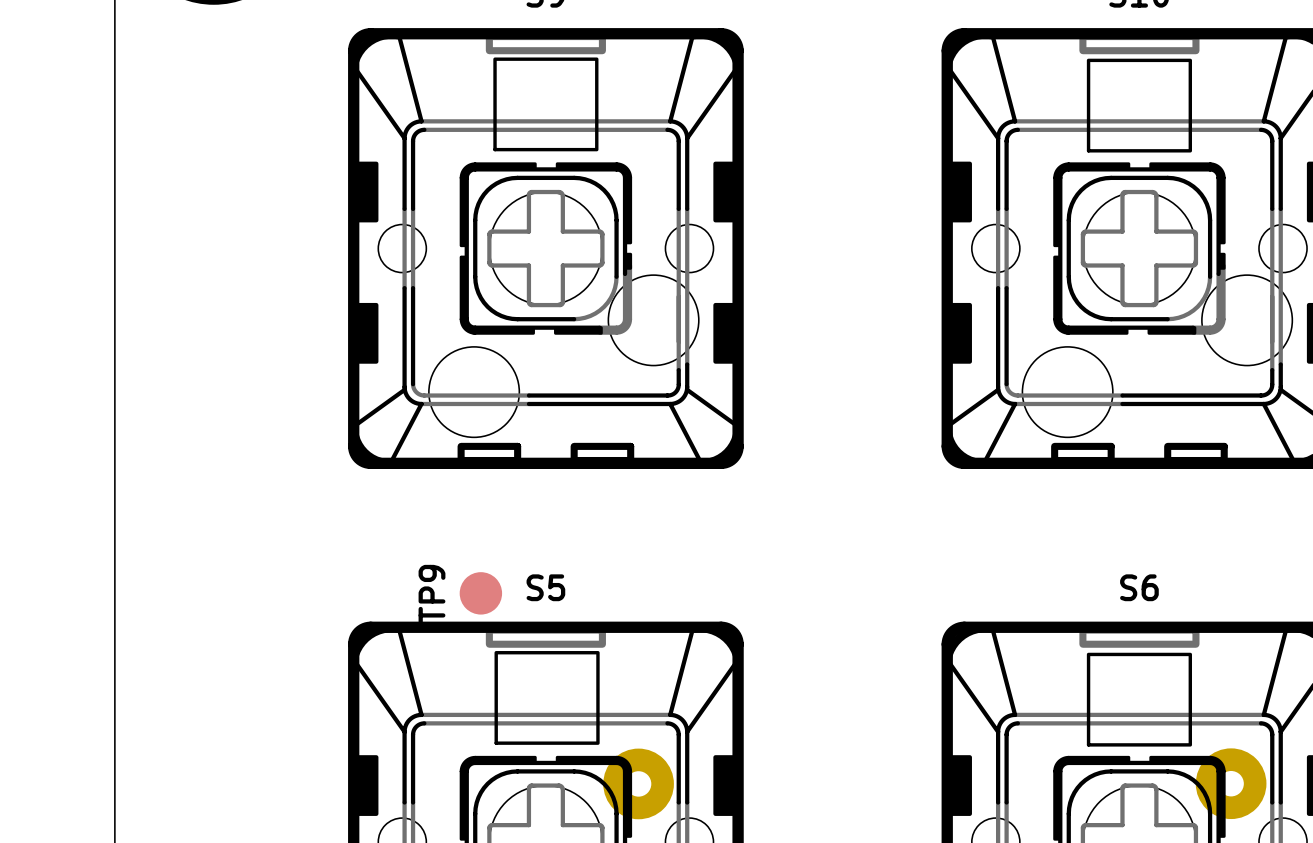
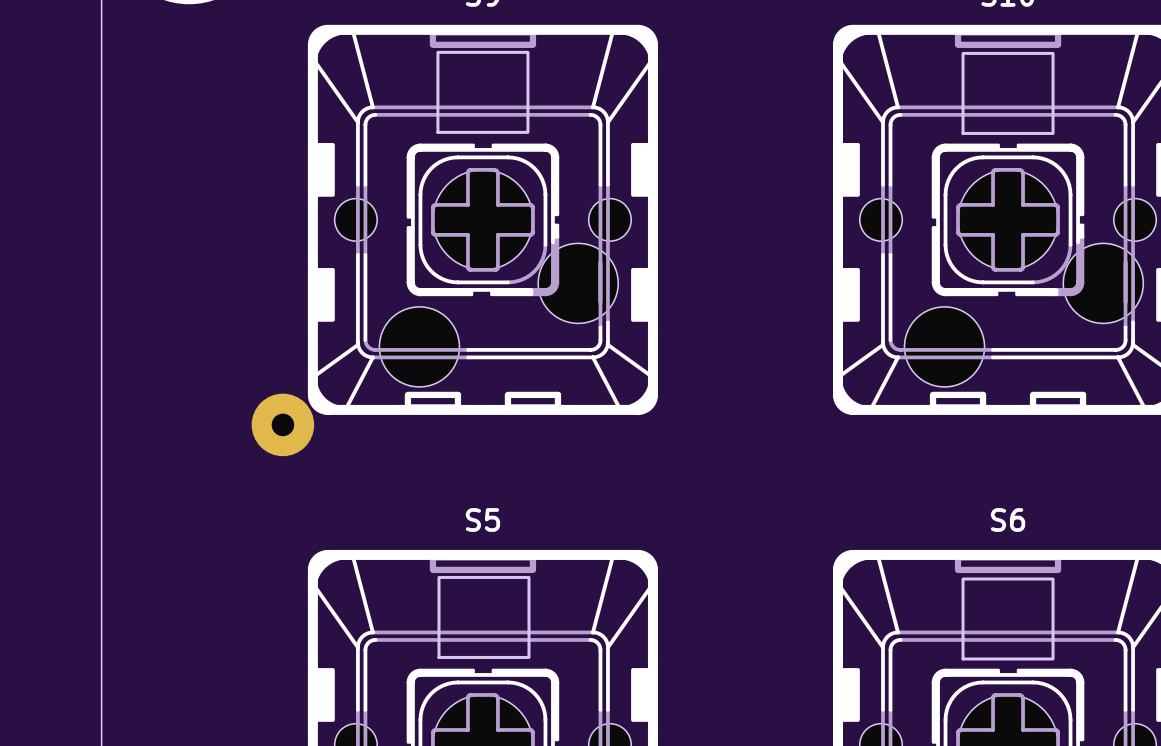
part: none -> (282, 424)
TP9: (480, 593) -> none
part: (638, 783) -> none
part: (1231, 783) -> none

